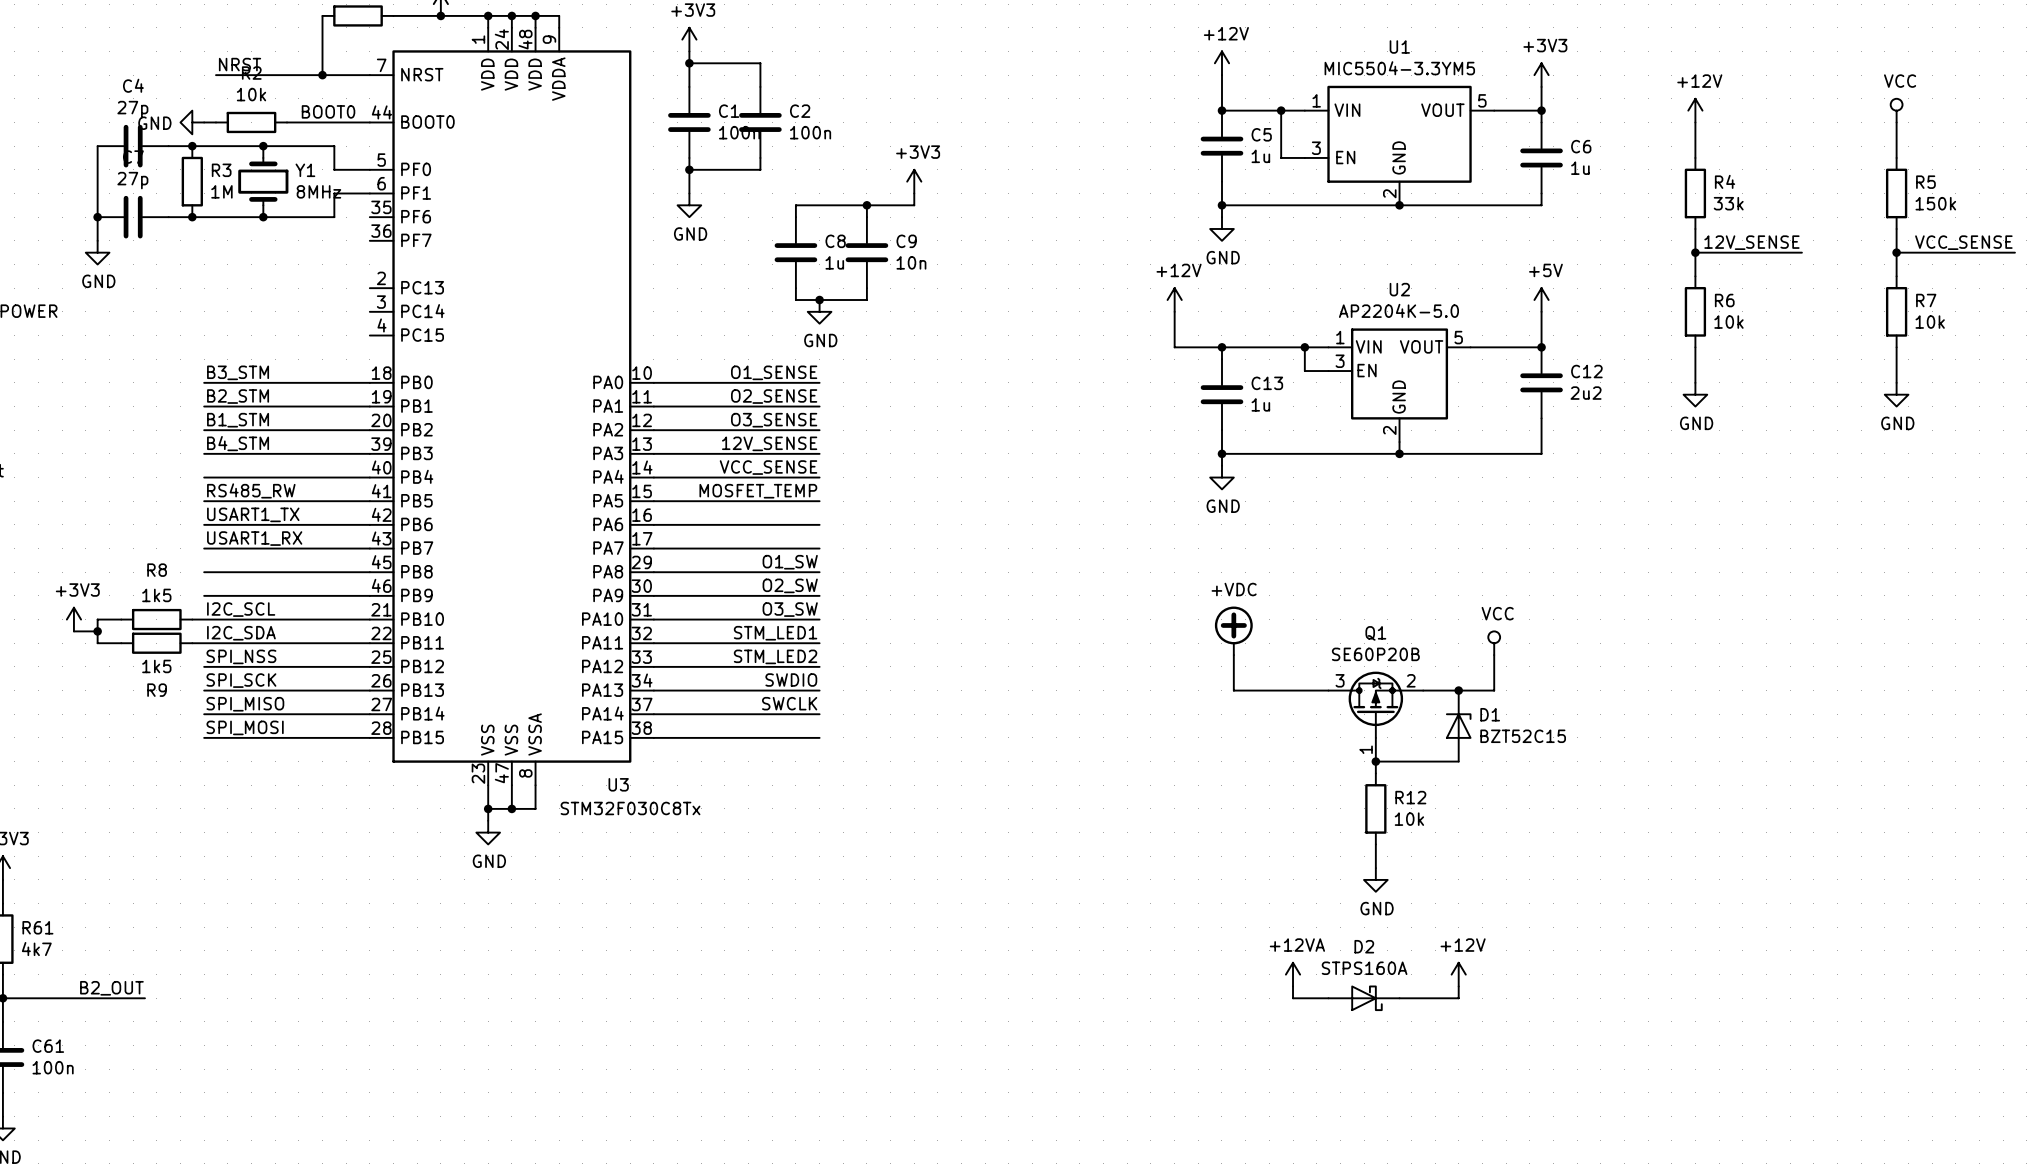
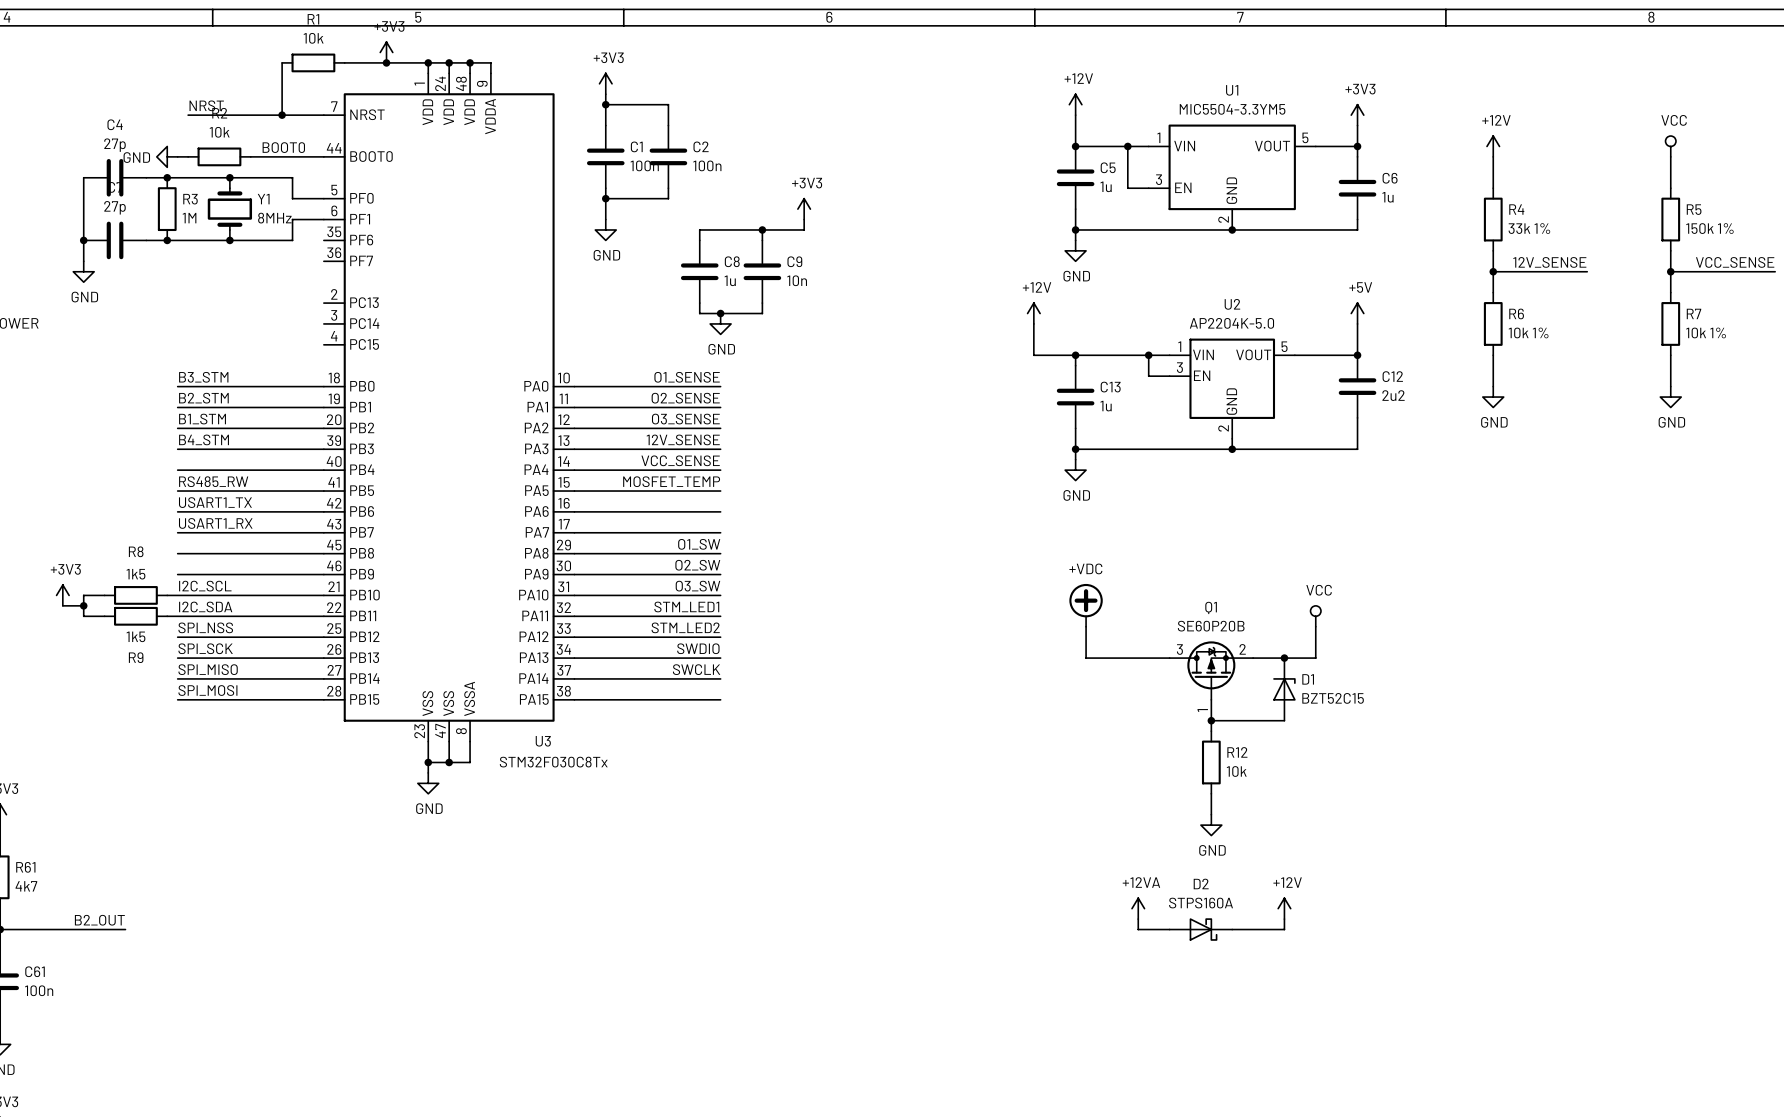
R4 value: 33k (1728, 203) -> 33k 1% (1529, 228)
R5 value: 150k (1935, 203) -> 150k 1% (1709, 228)
R6 value: 10k (1728, 322) -> 10k 1% (1528, 332)
R7 value: 10k (1930, 322) -> 10k 1% (1706, 332)

